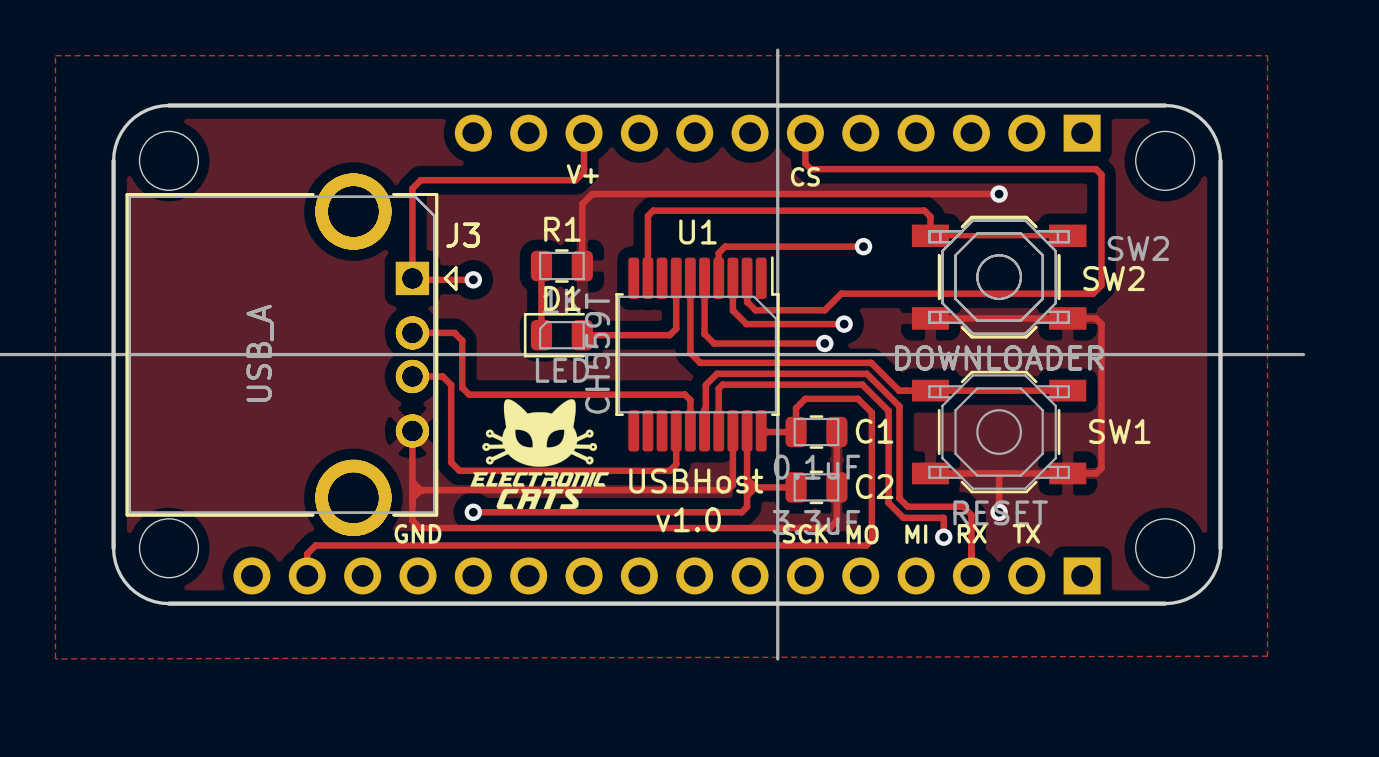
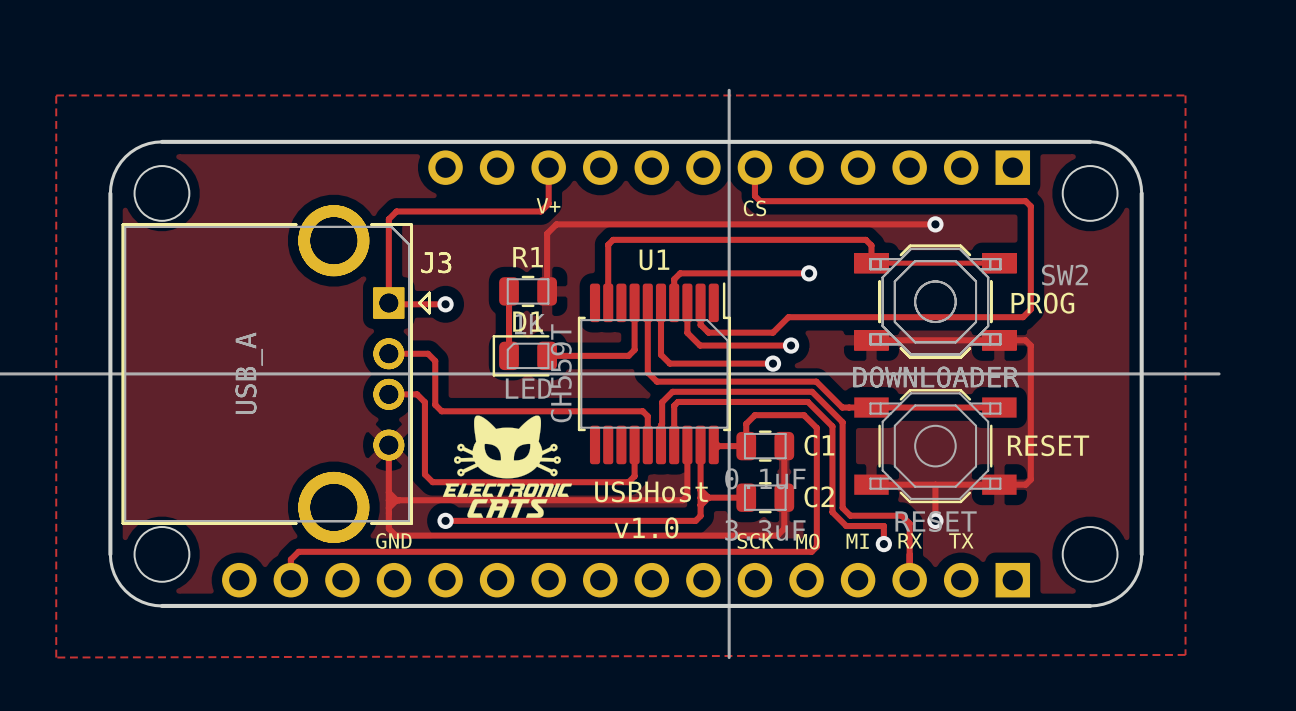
SW2 name: SW2 (1113, 278) -> PROG (1042, 303)
SW1 name: SW1 (1119, 431) -> RESET (1048, 445)

